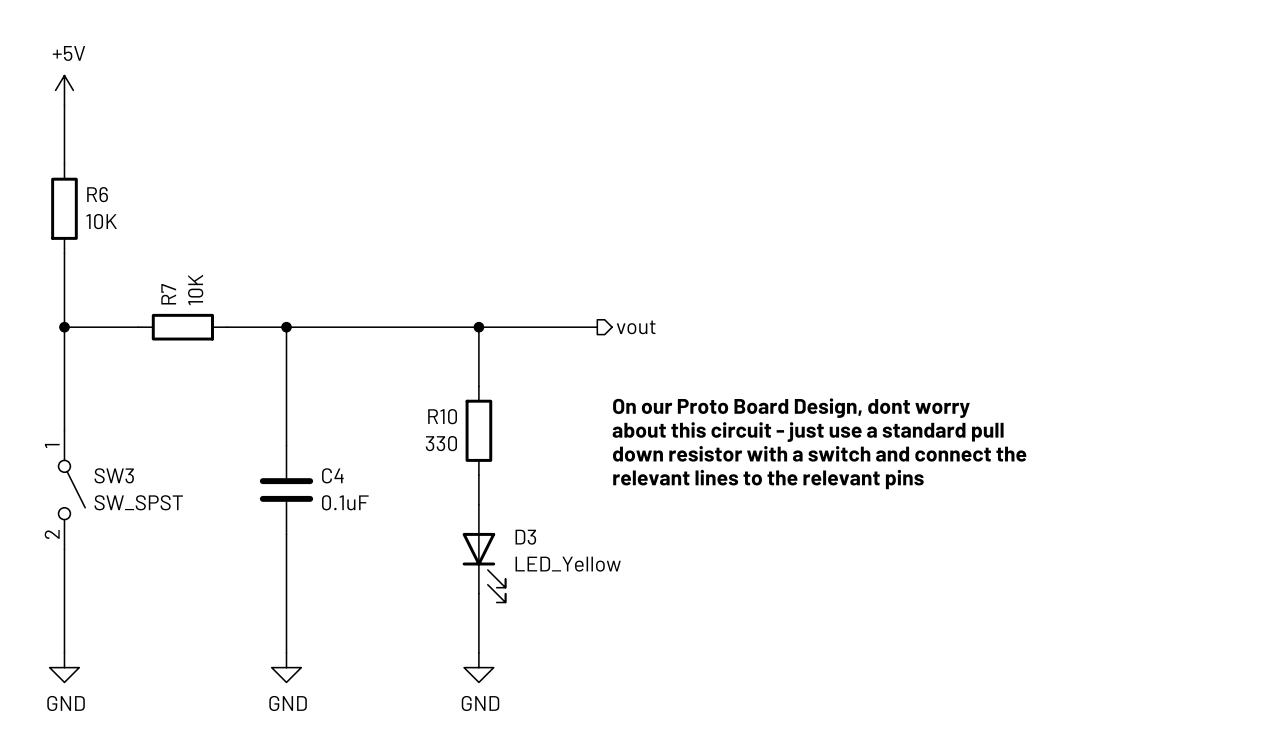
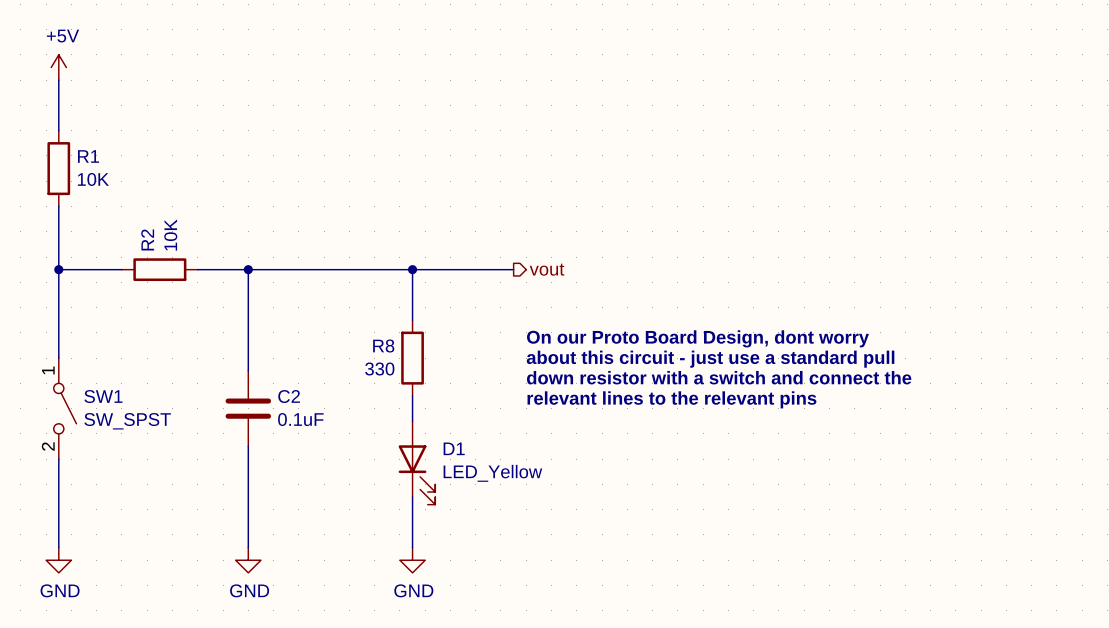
R6 name: R6 (97, 194) -> R1 (88, 156)
R7 name: R7 (168, 294) -> R2 (147, 239)
R10 name: R10 (442, 416) -> R8 (383, 346)
SW3 name: SW3 (114, 475) -> SW1 (103, 396)
C4 name: C4 (332, 475) -> C2 (289, 396)
D3 name: D3 (525, 537) -> D1 (454, 448)

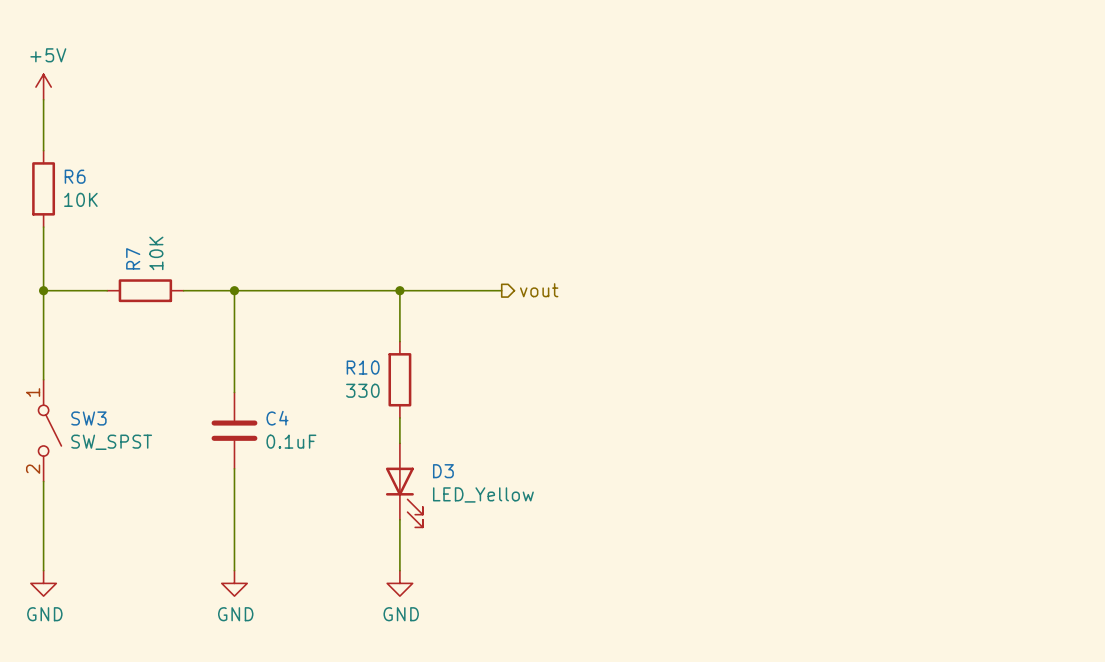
R1 name: R1 (88, 156) -> R6 (75, 176)
R2 name: R2 (147, 239) -> R7 (133, 258)
text: On our Proto Board Design, dont worry (697, 338) -> none
R8 name: R8 (383, 346) -> R10 (363, 367)
text: about this circuit - just use a standard pull (710, 359) -> none
text: down resistor with a switch and connect the (719, 377) -> none
SW1 name: SW1 (103, 396) -> SW3 (88, 418)
C2 name: C2 (289, 396) -> C4 (277, 418)
text: relevant lines to the relevant pins (671, 399) -> none
D1 name: D1 (454, 448) -> D3 (443, 471)

